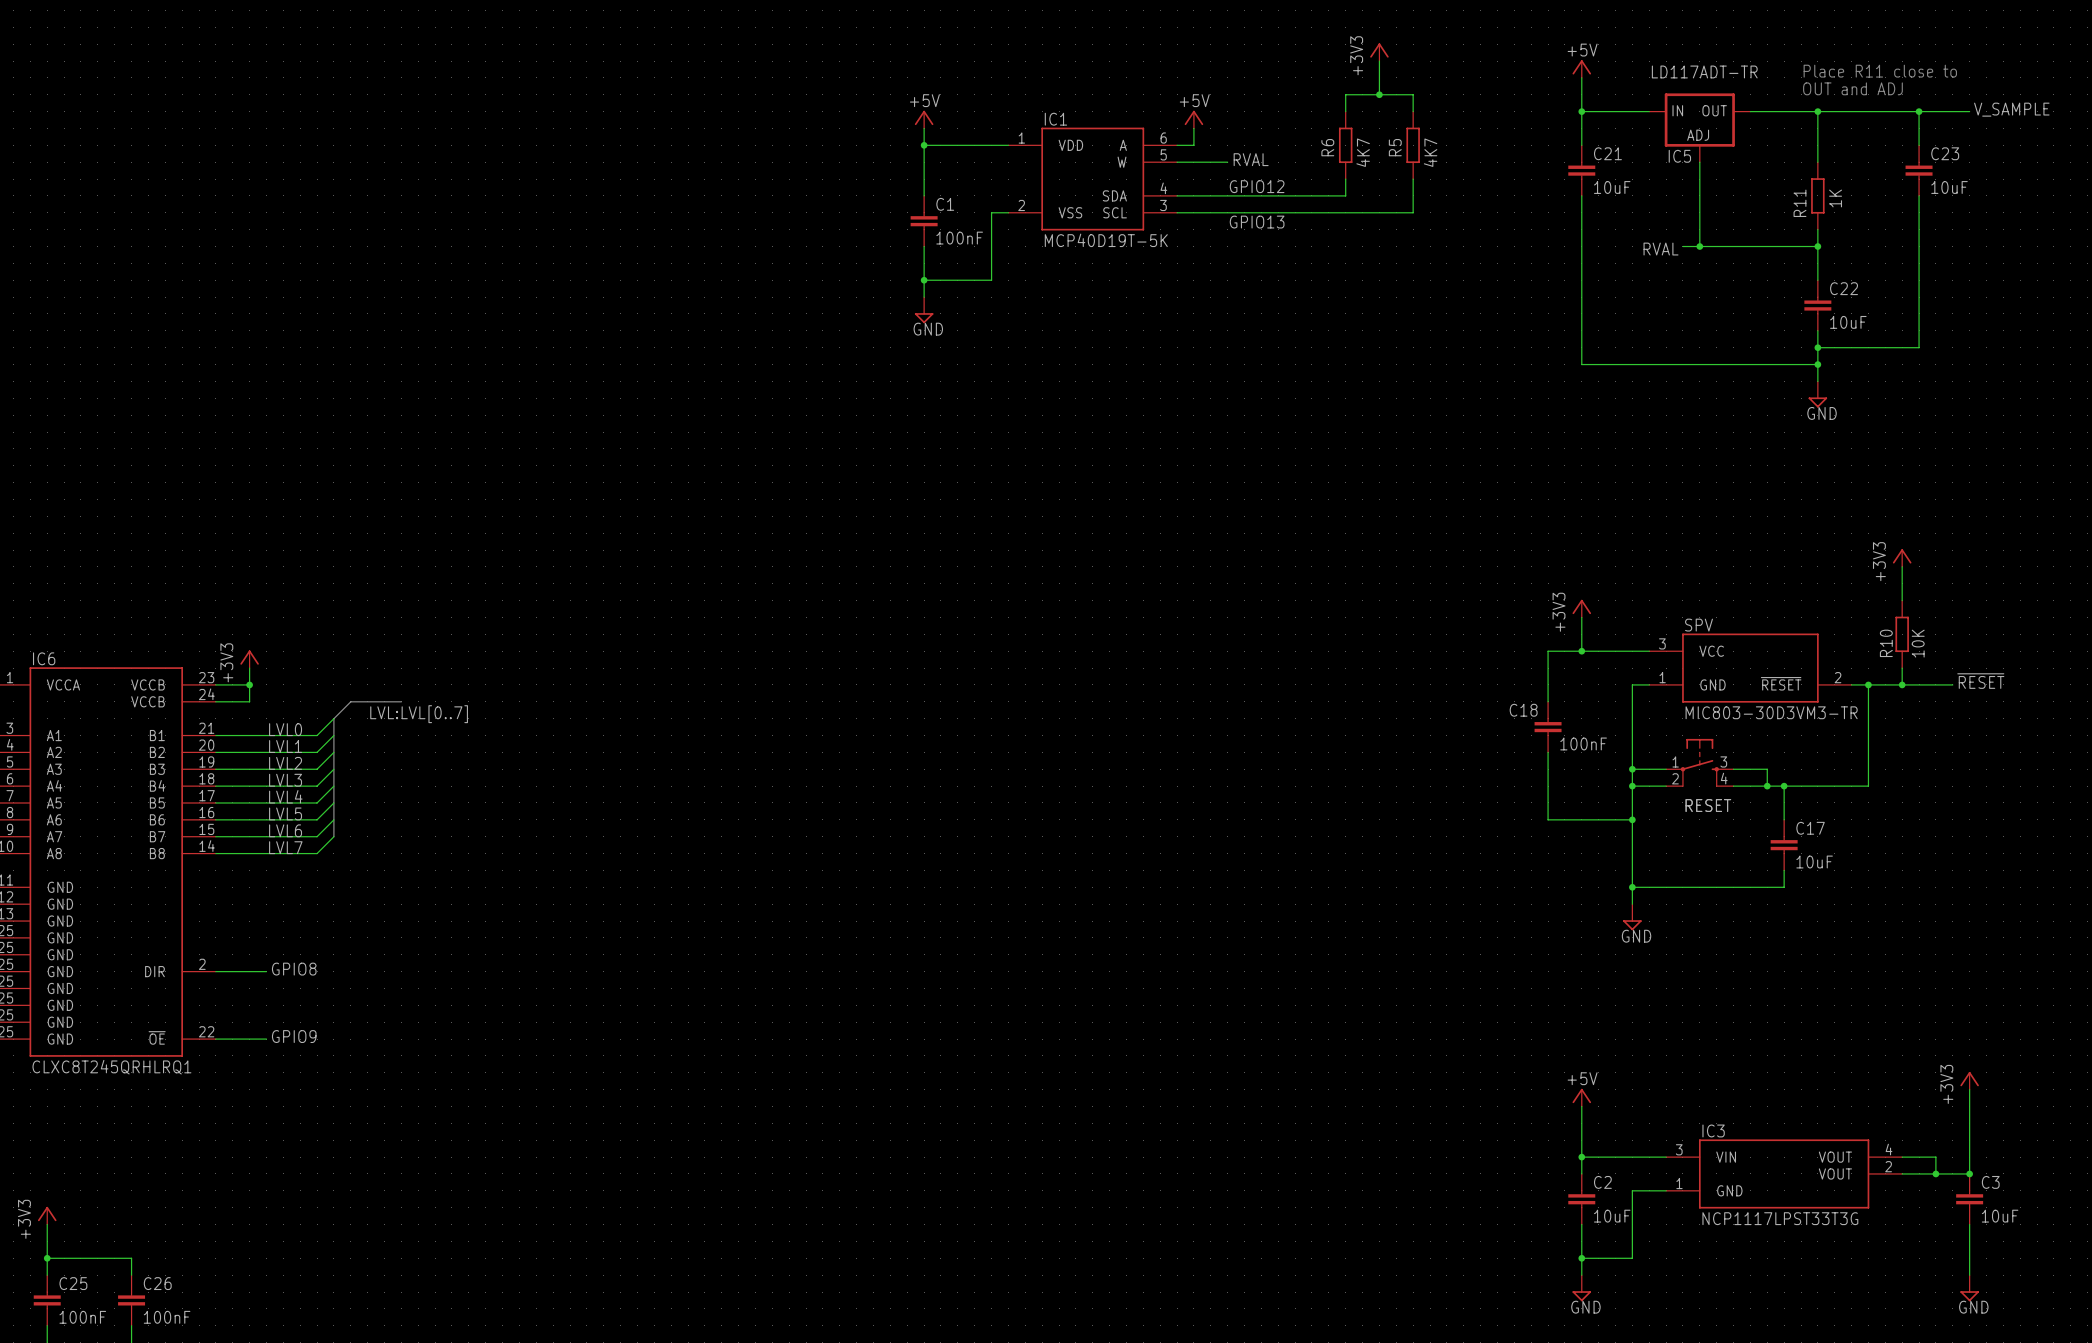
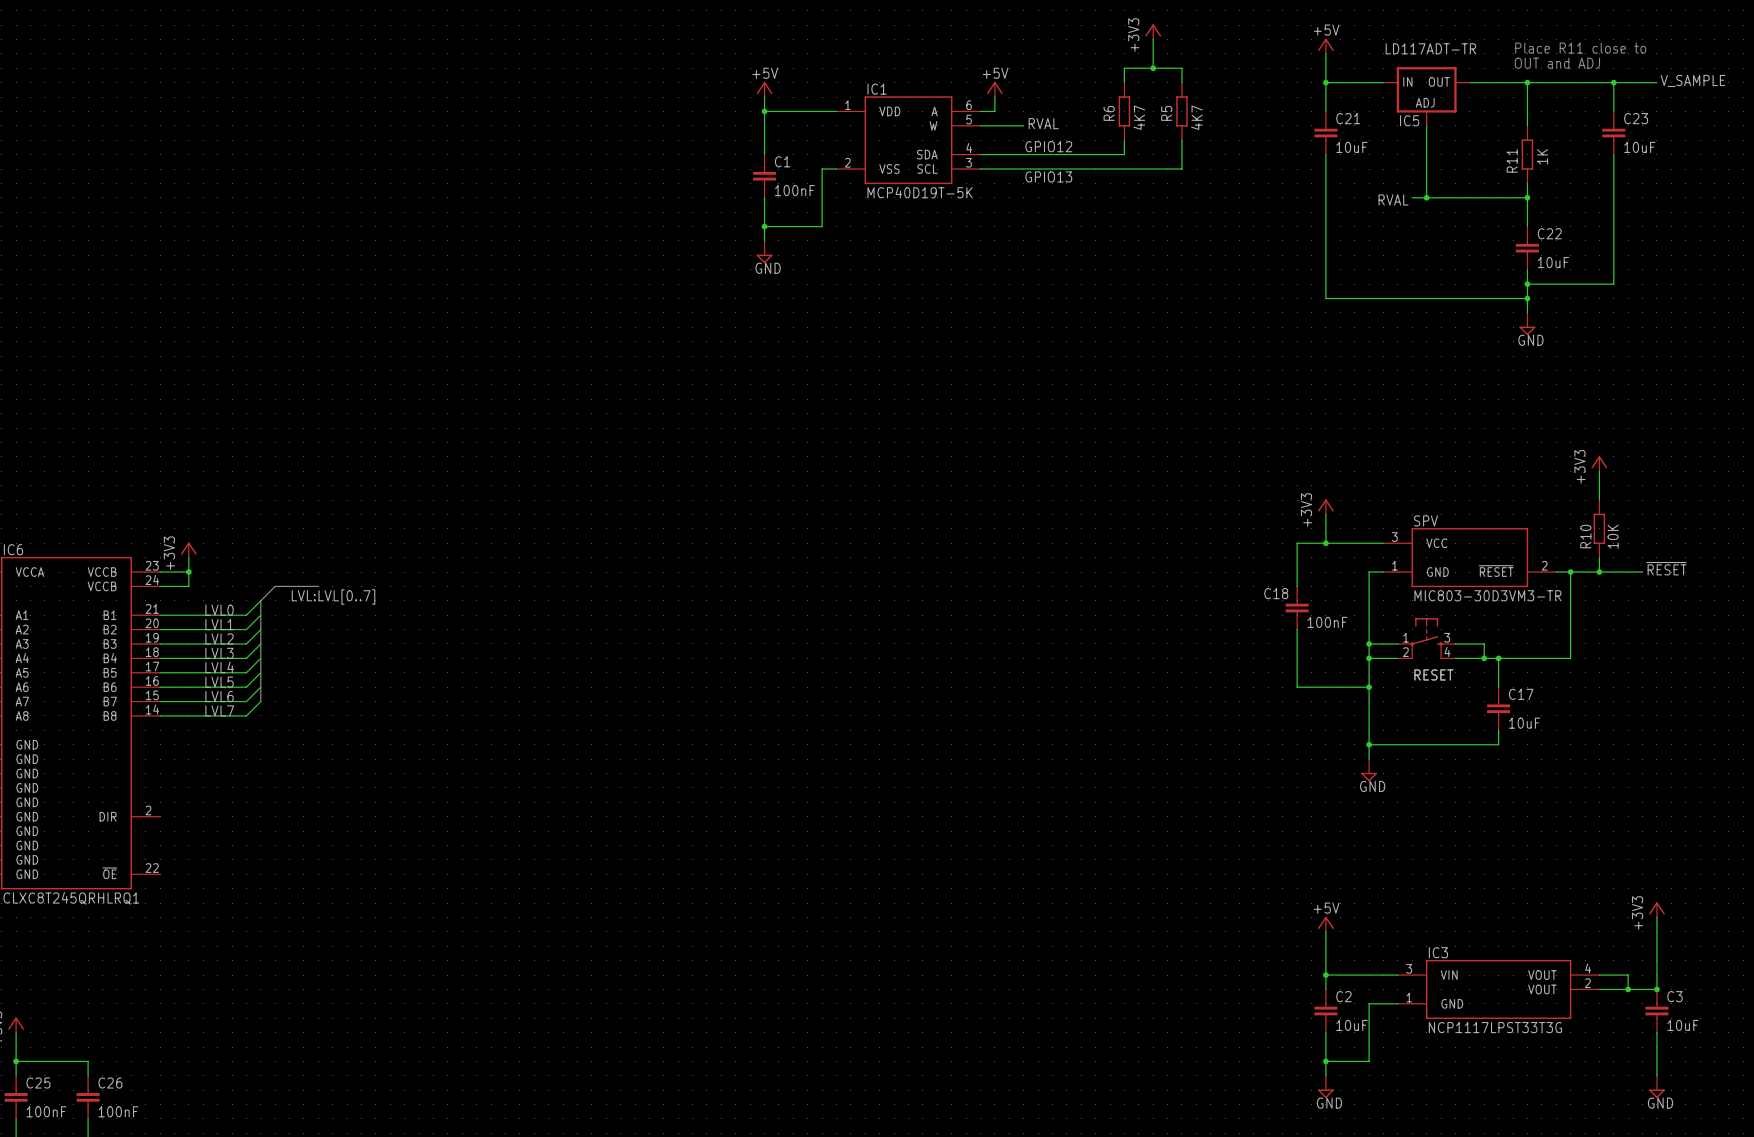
label: GPIO8 (294, 969) -> none
wire: (215, 971) (266, 971) -> none
label: GPIO9 (294, 1036) -> none
wire: (215, 1039) (266, 1039) -> none

